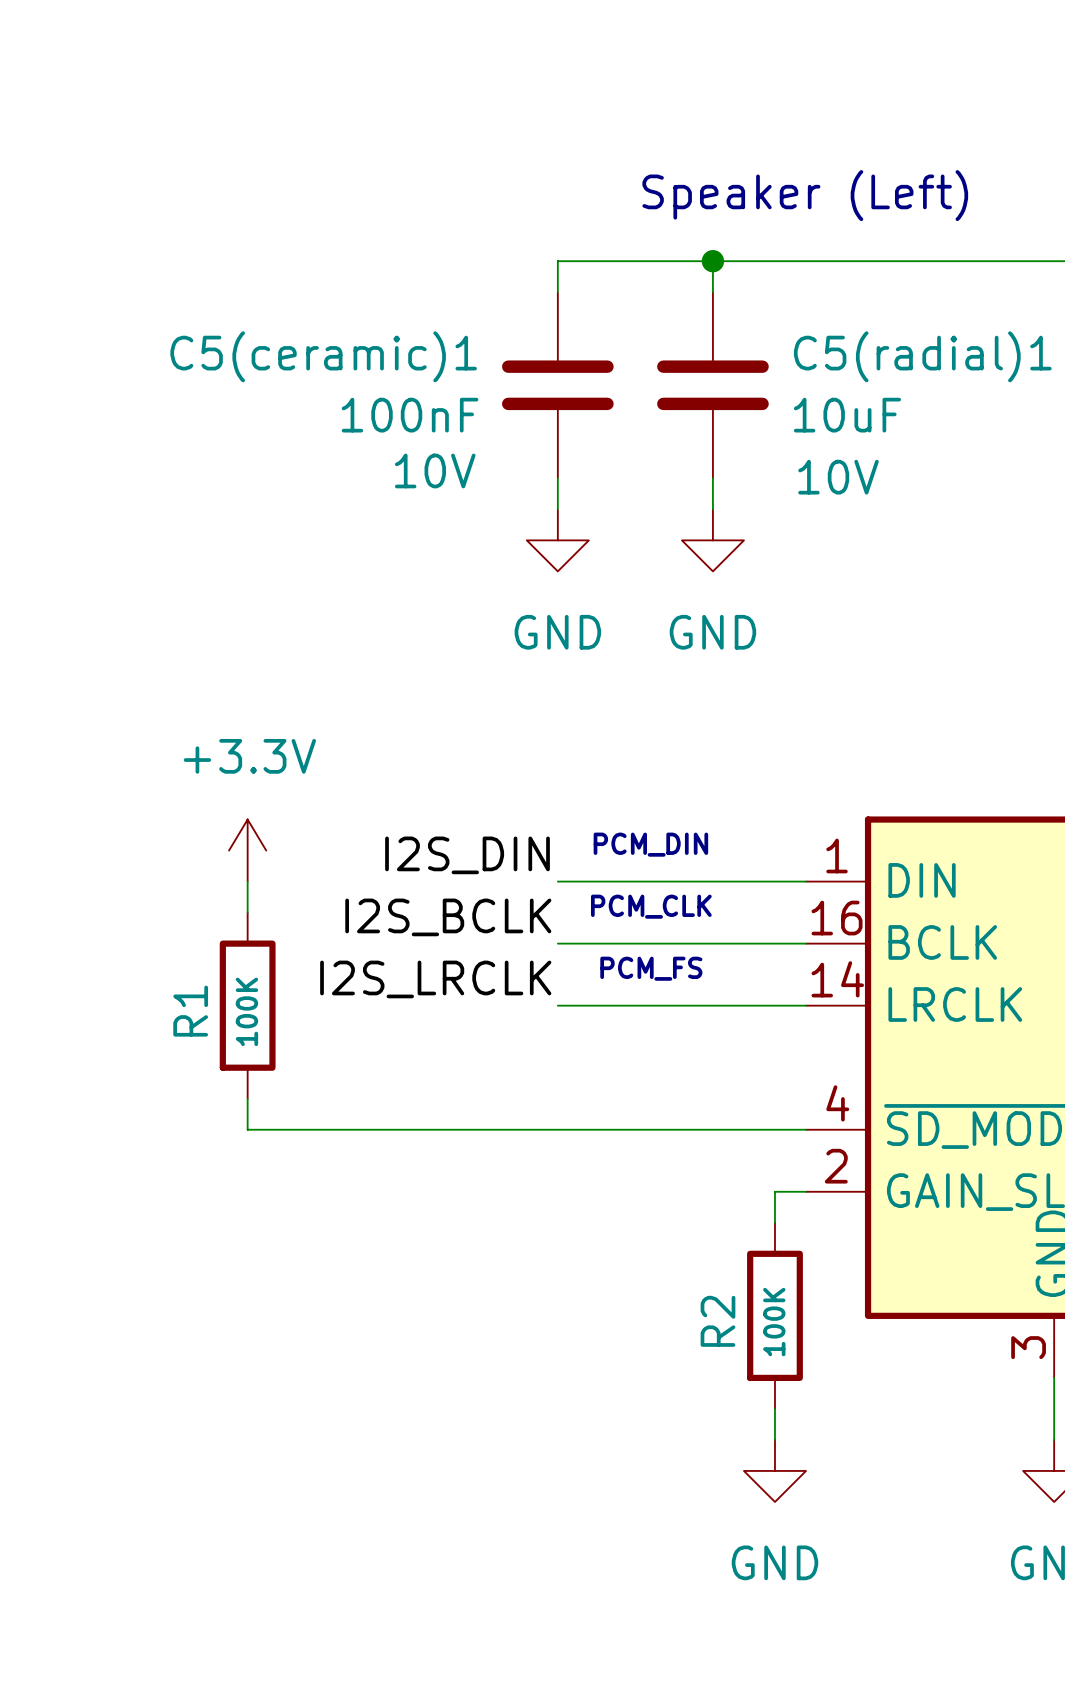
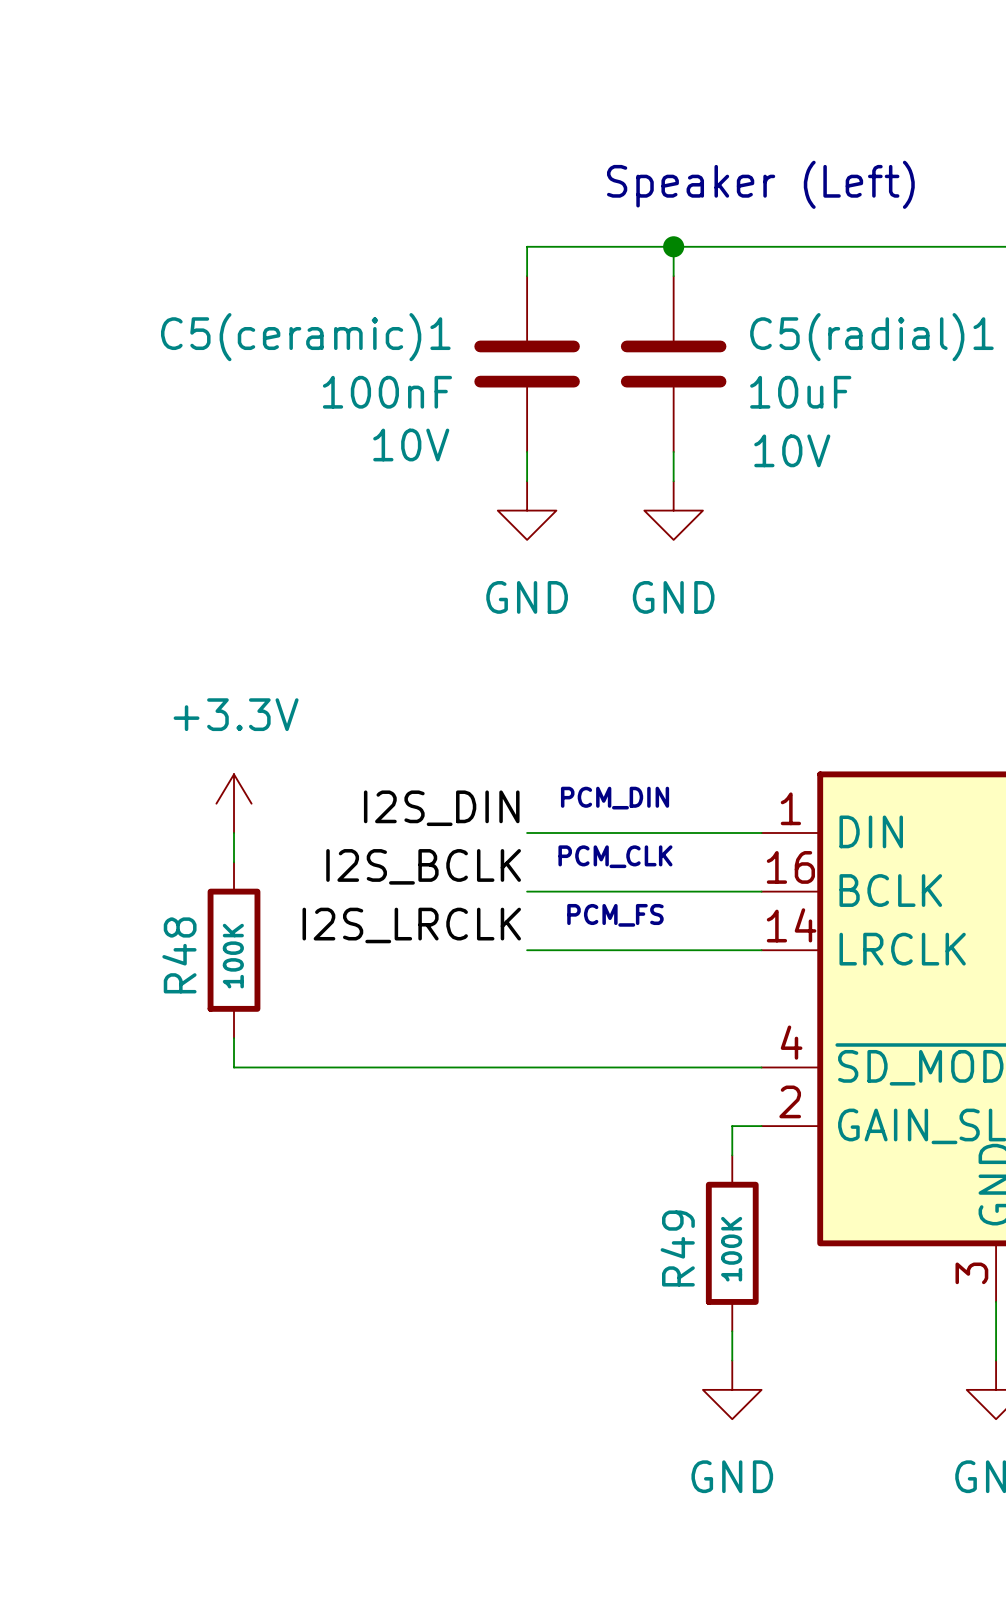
R1 name: R1 (190, 1011) -> R48 (179, 955)
R2 name: R2 (717, 1321) -> R49 (677, 1248)

